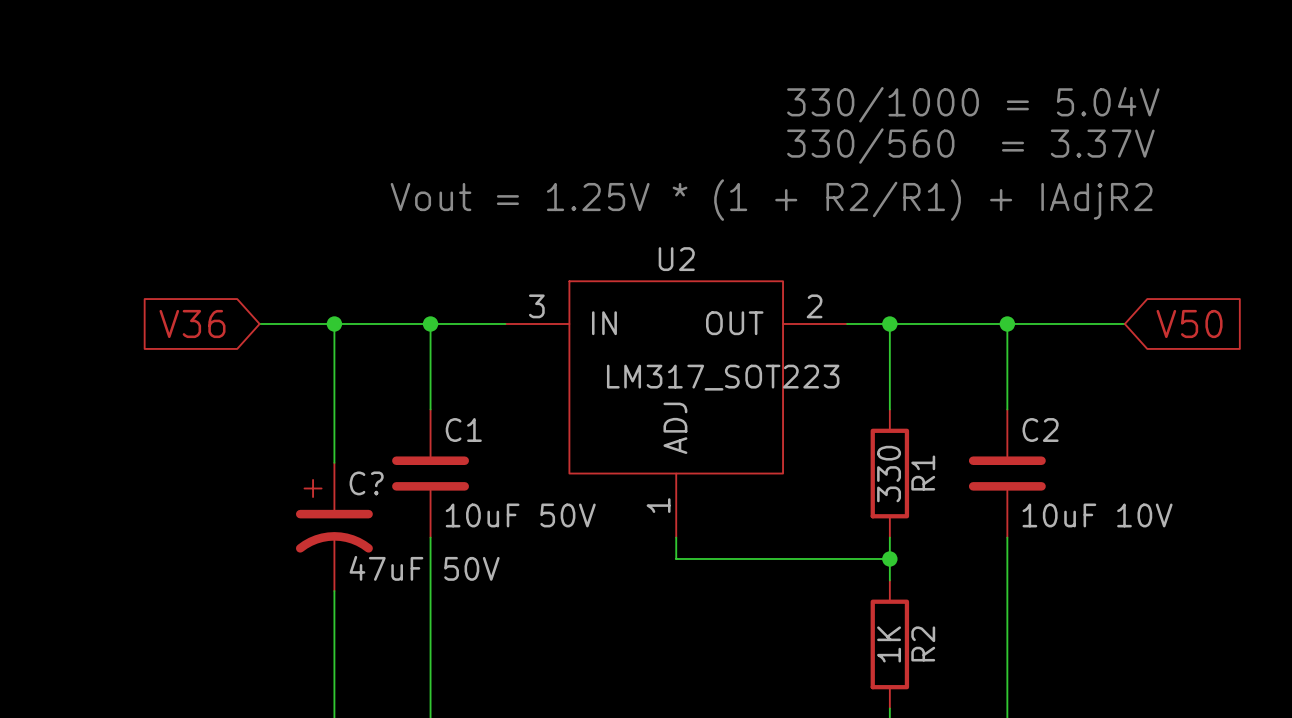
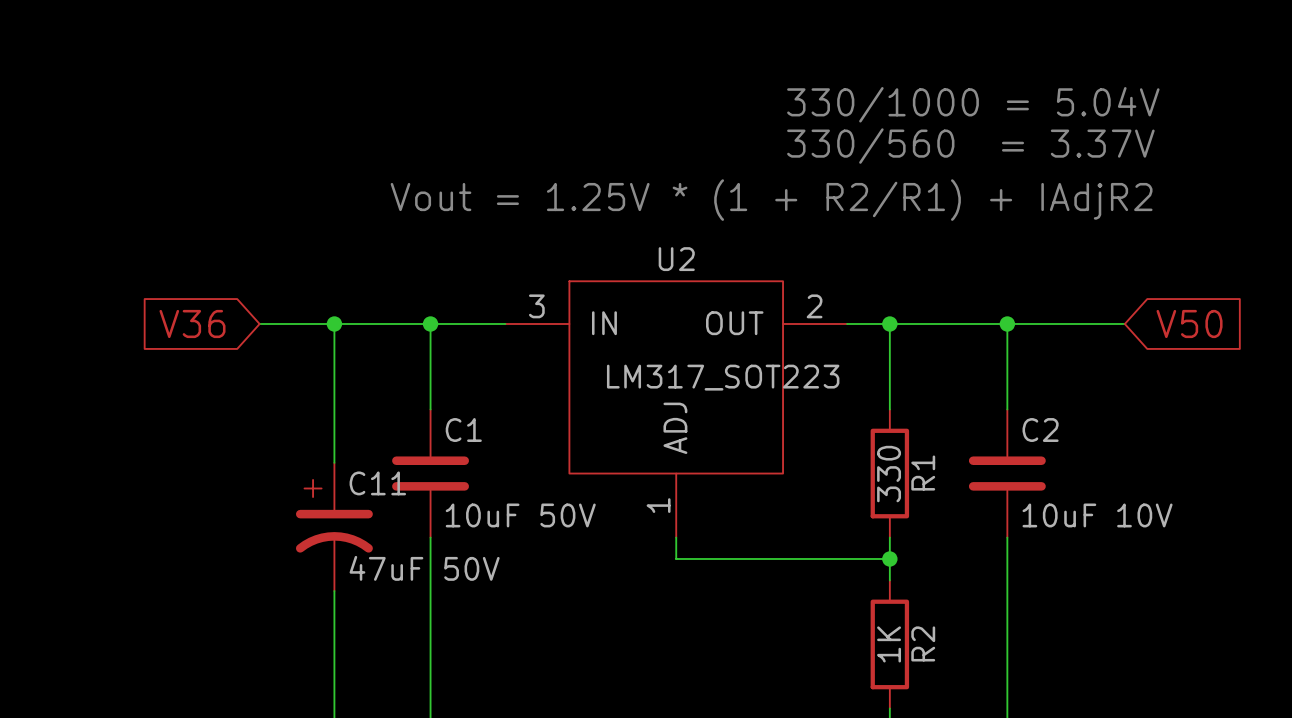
C? name: C? (366, 483) -> C11 (377, 483)

